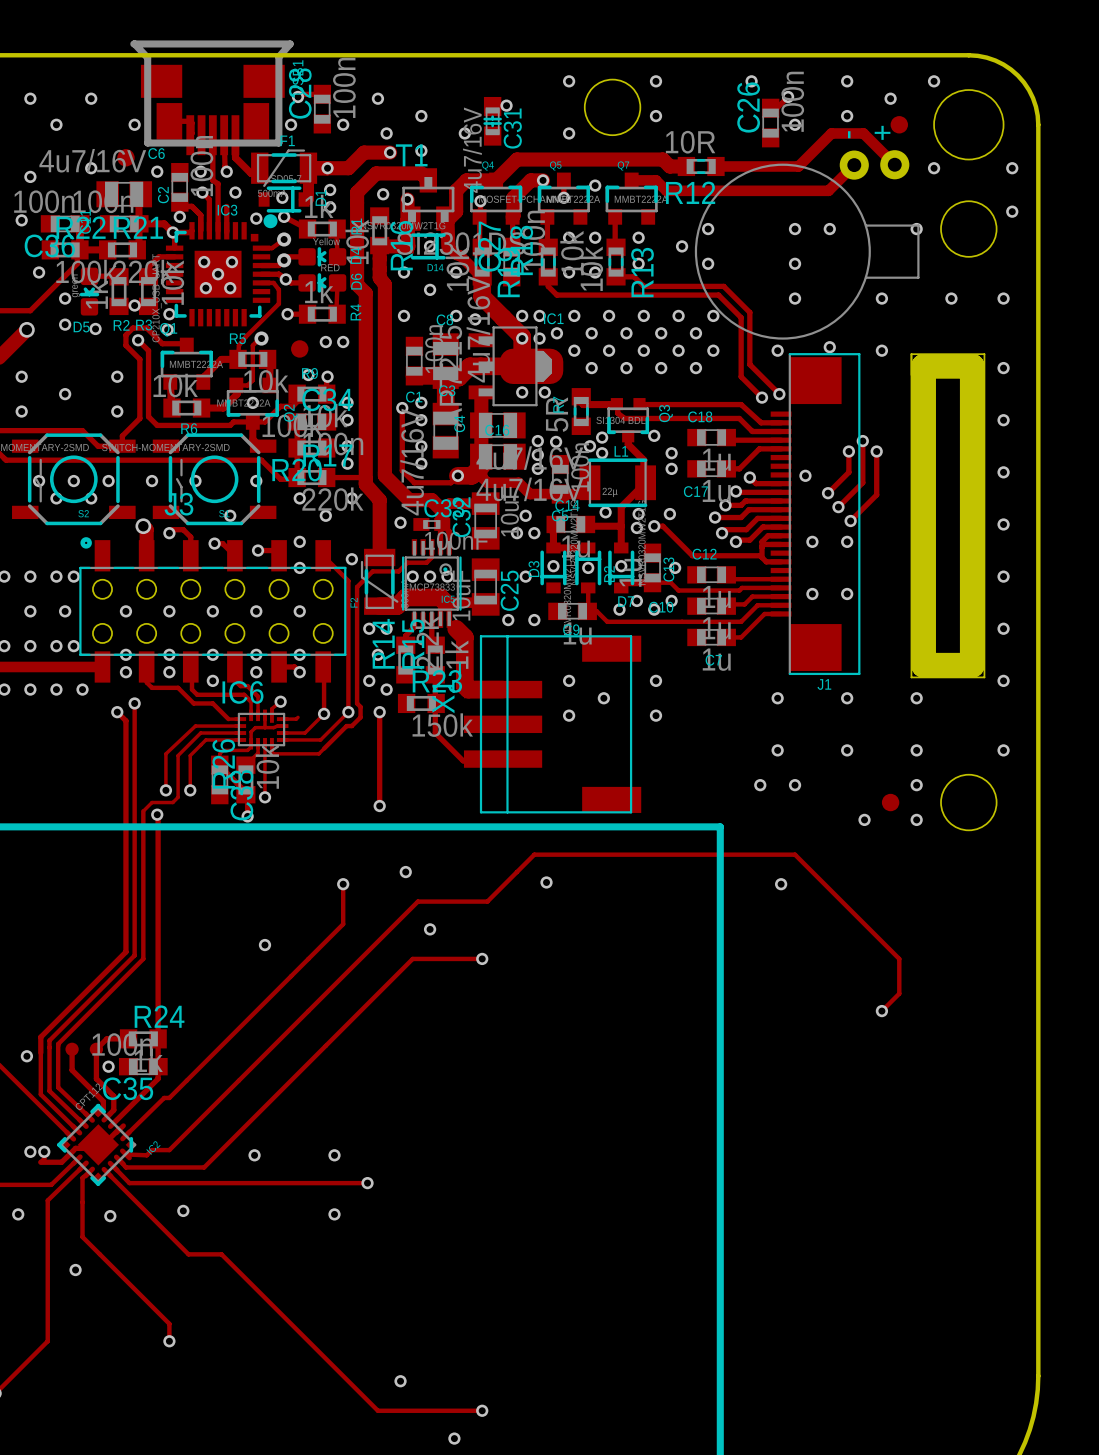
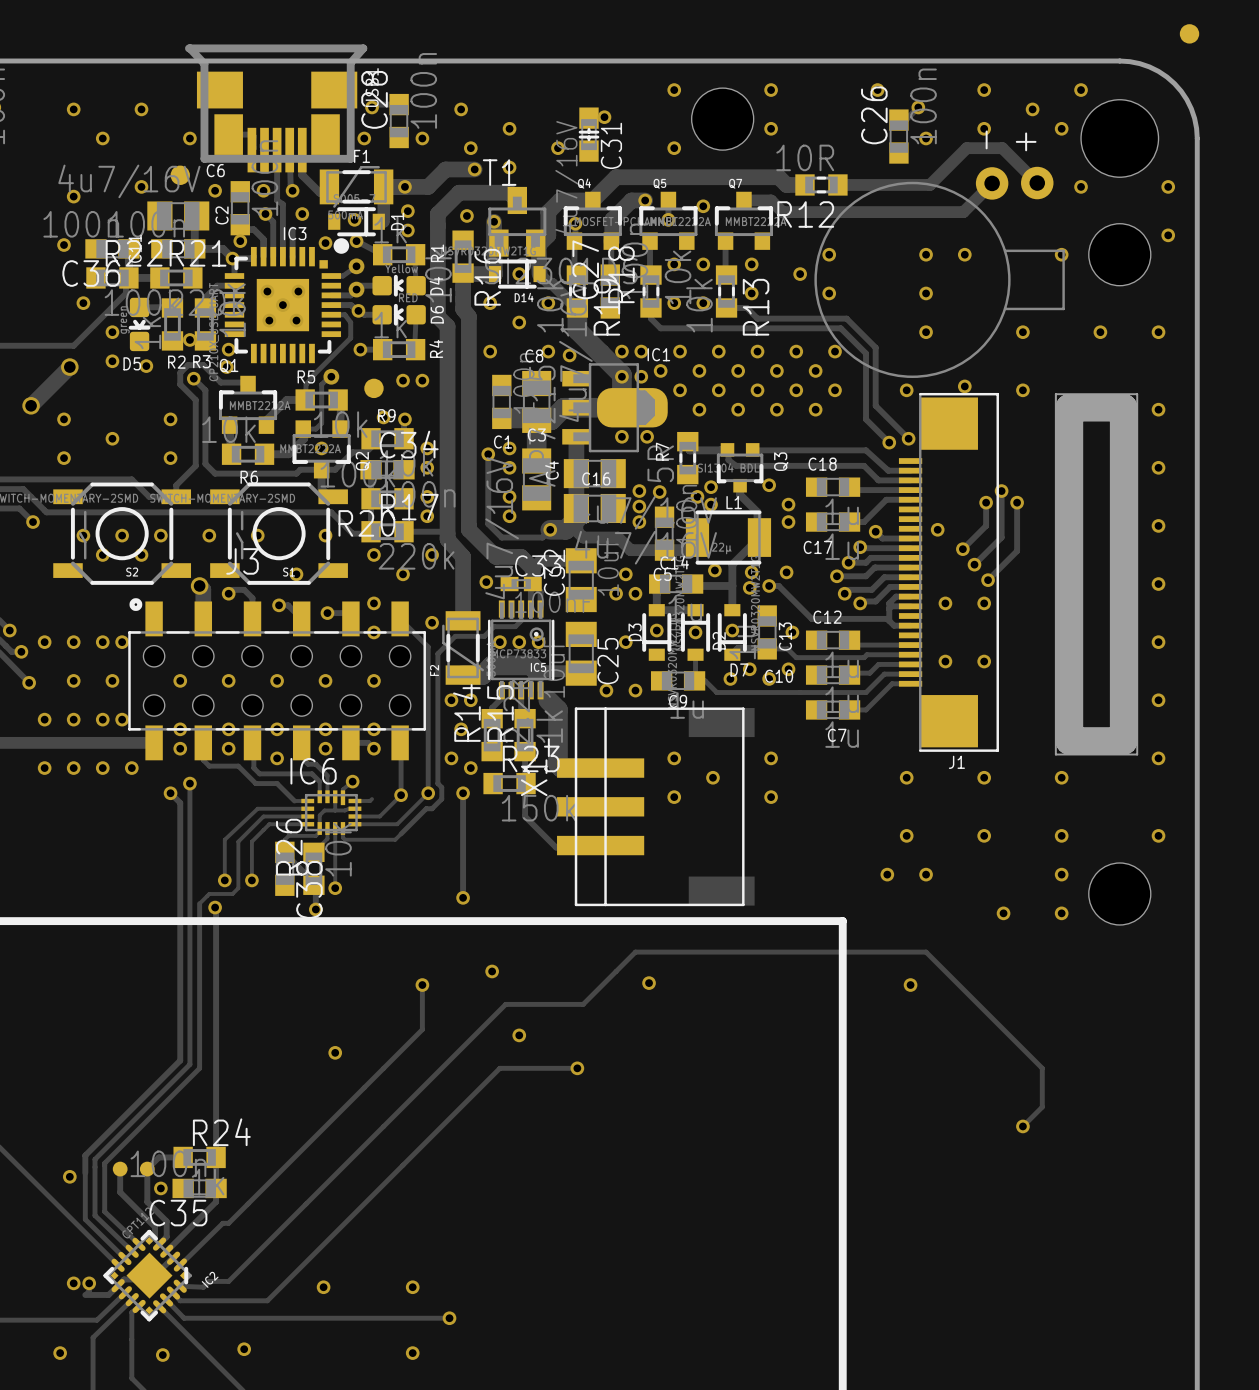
via: none -> (1061, 128)
part position: (899, 124) -> (1189, 33)
part: (890, 802) -> none

